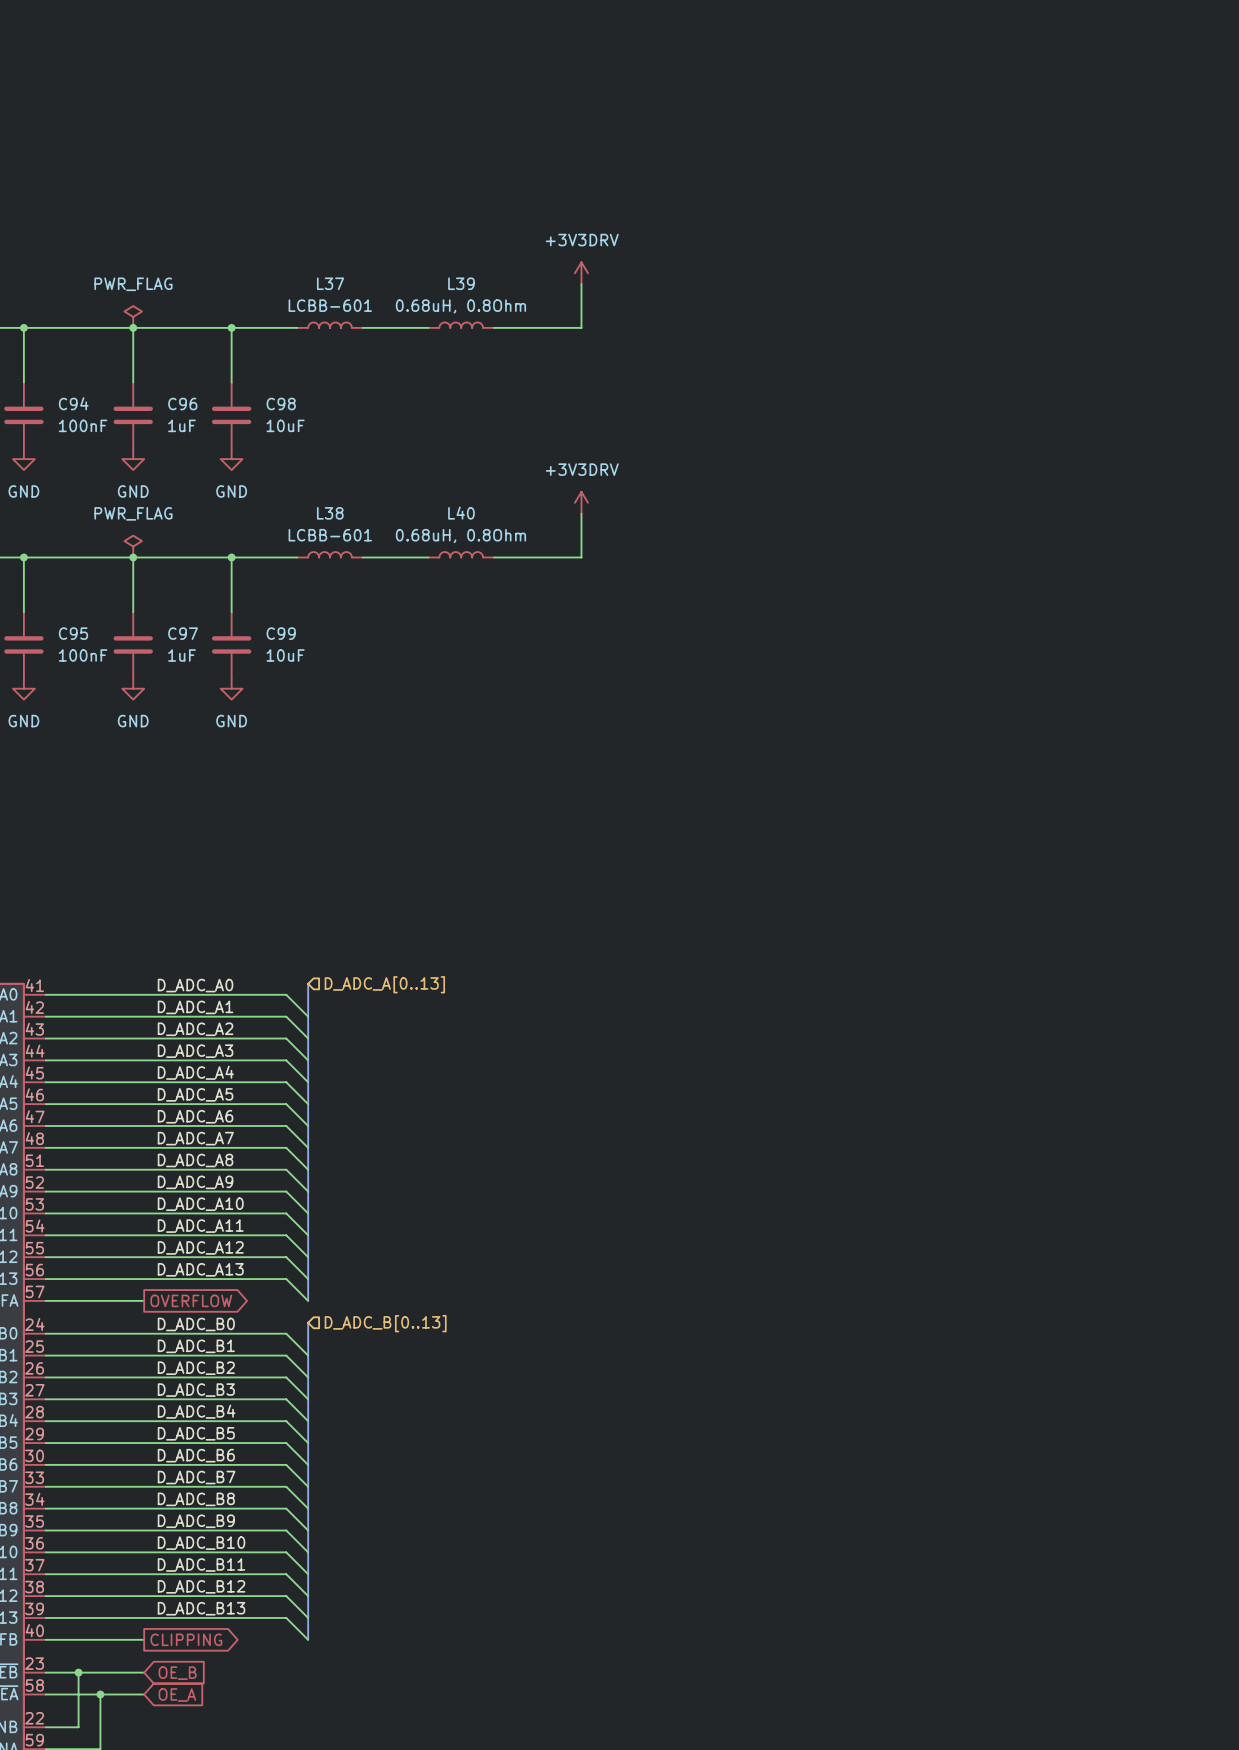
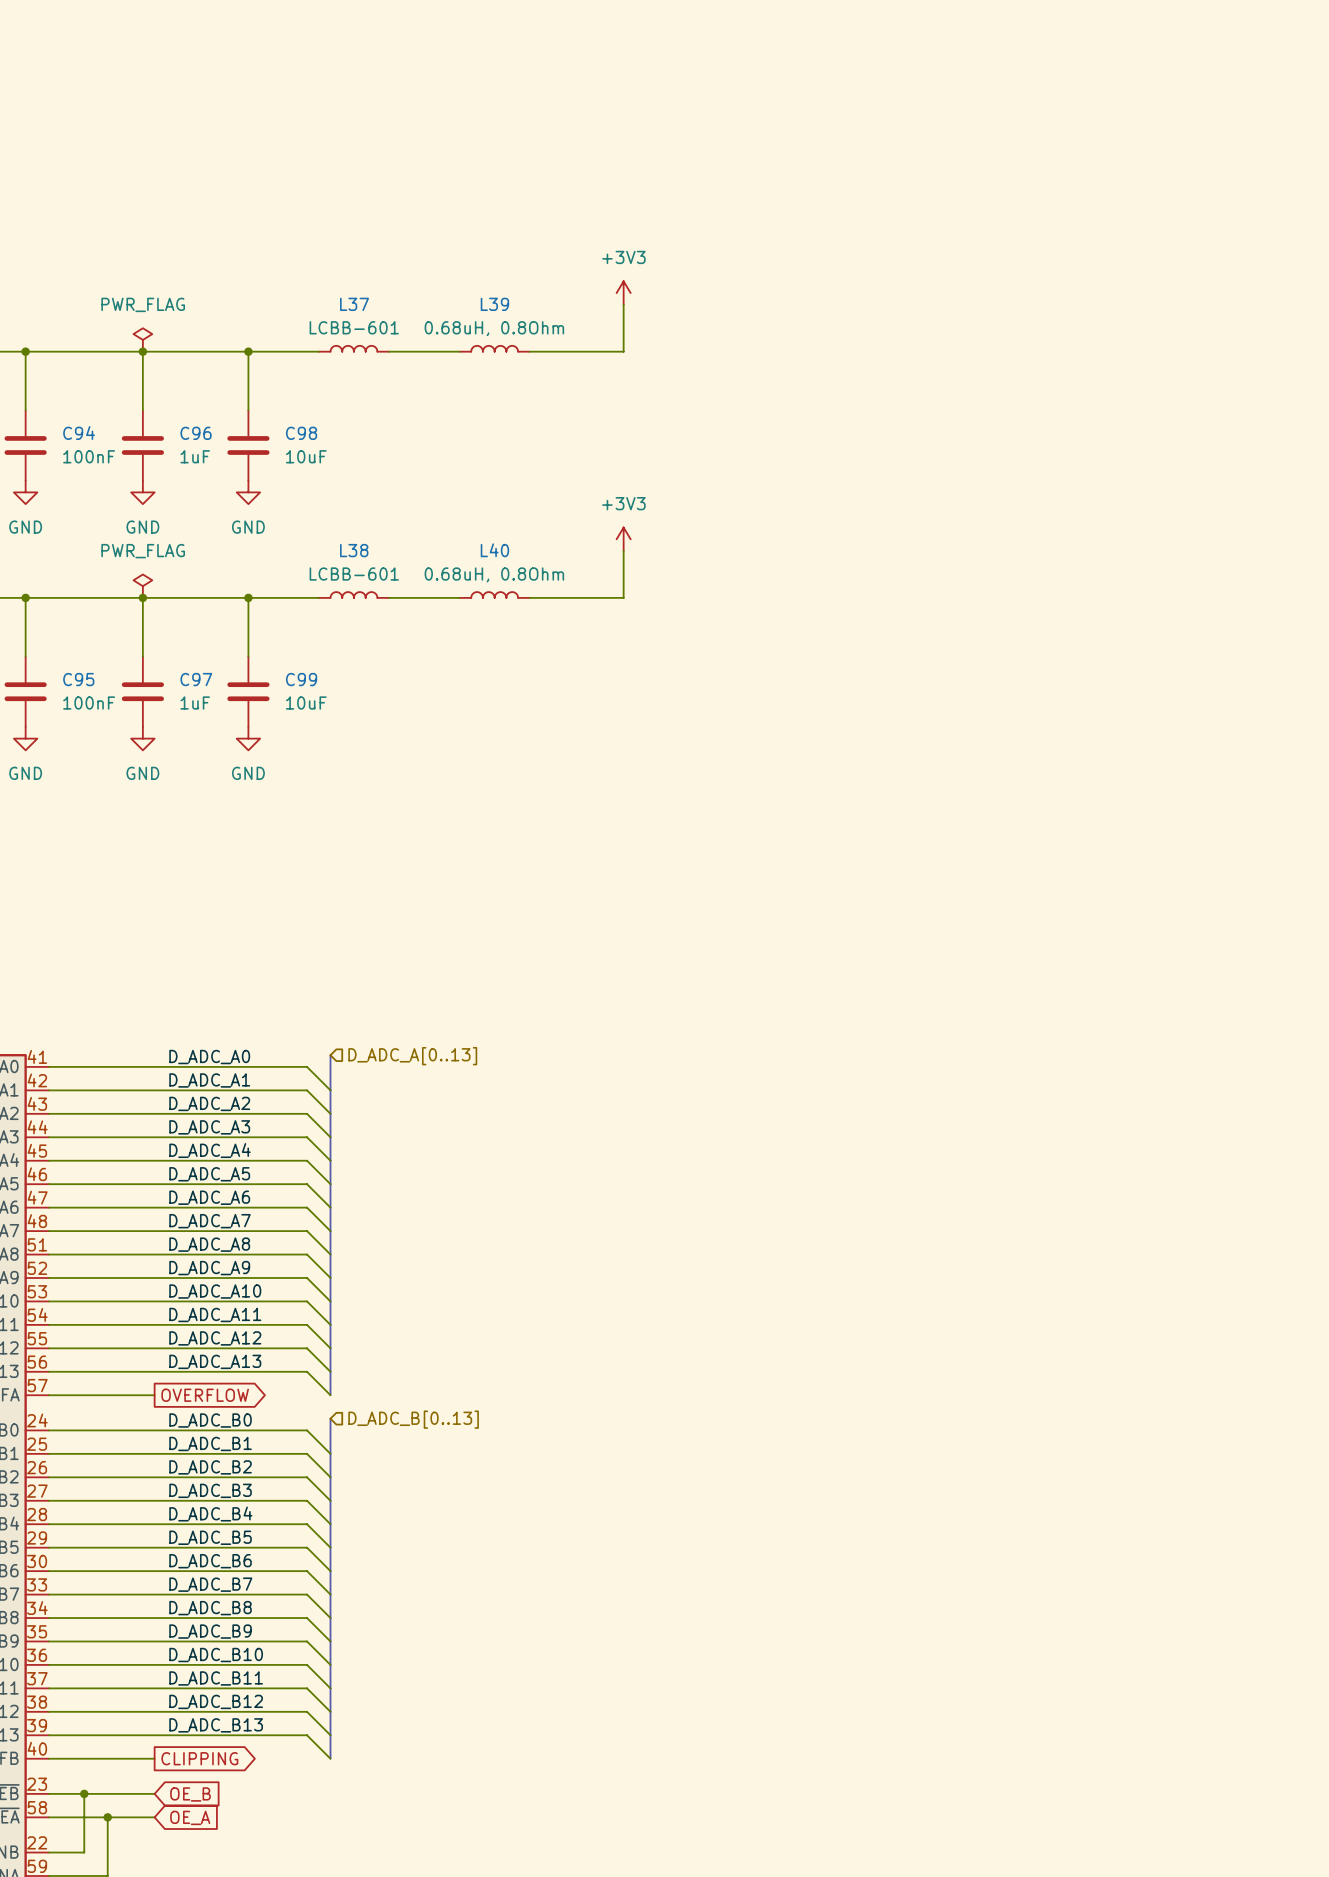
power symbol: +3V3DRV (581, 273) -> +3V3 (623, 293)
power symbol: +3V3DRV (581, 502) -> +3V3 (623, 539)

